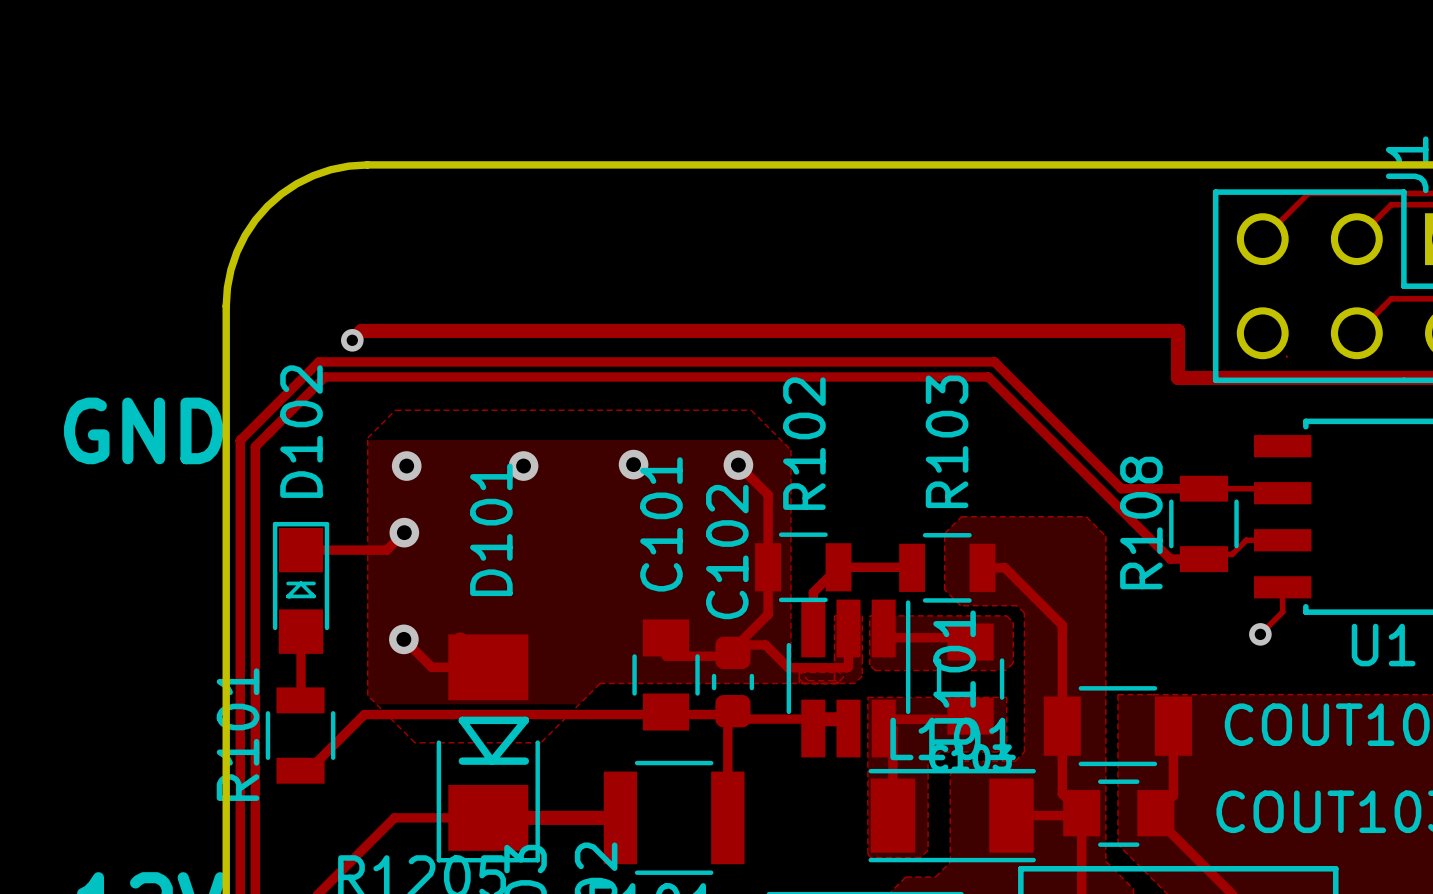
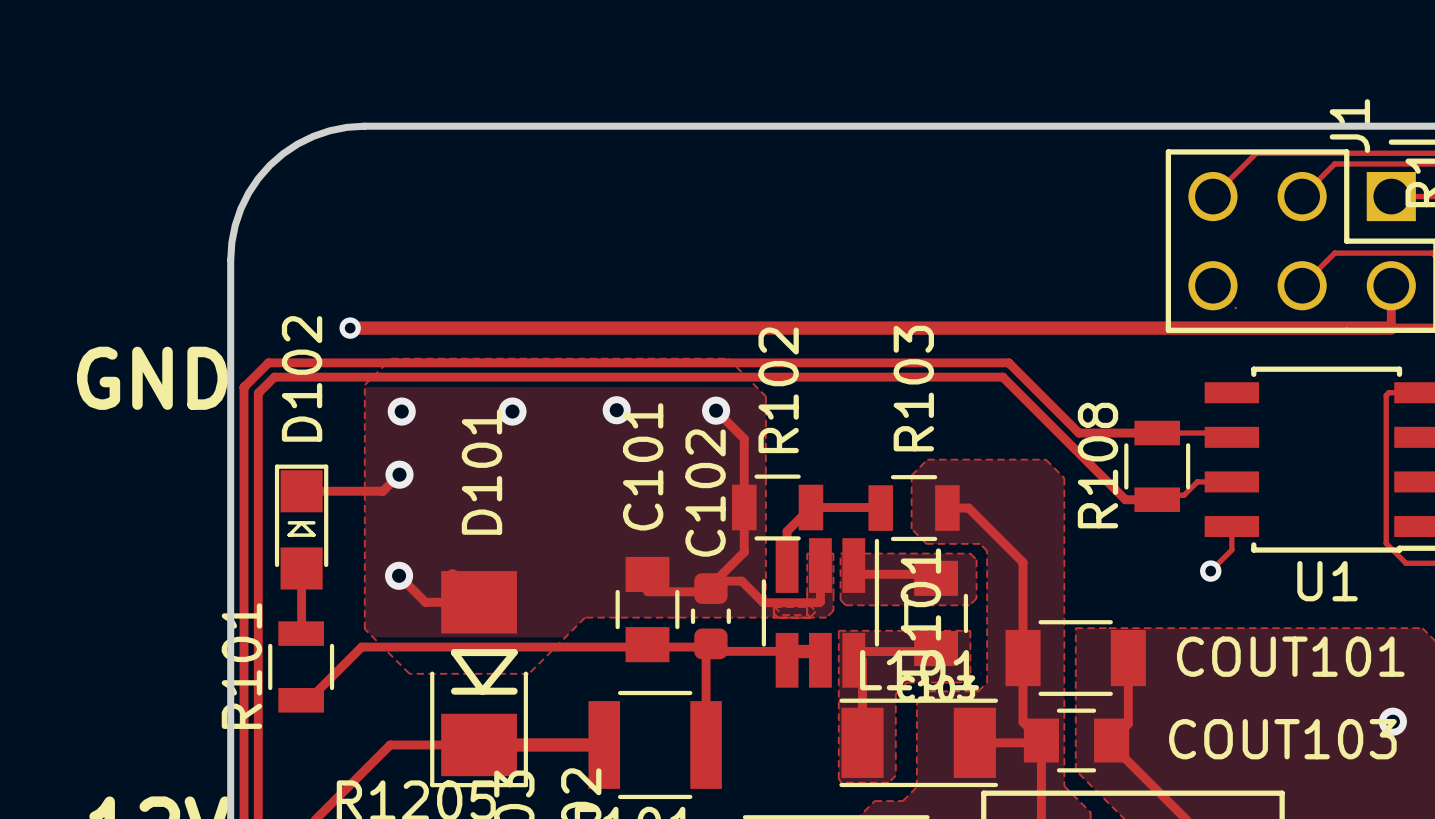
track: (352, 340) (361, 330) (1178, 330) (1178, 377) -> (350, 328) (1132, 328)
via position: (352, 340) -> (350, 328)
track: (266, 414) (318, 361) (994, 361) (1047, 414) -> (268, 362) (1008, 362)
track: (272, 429) (325, 377) (988, 377) (1041, 429) -> (274, 377) (1002, 377)

